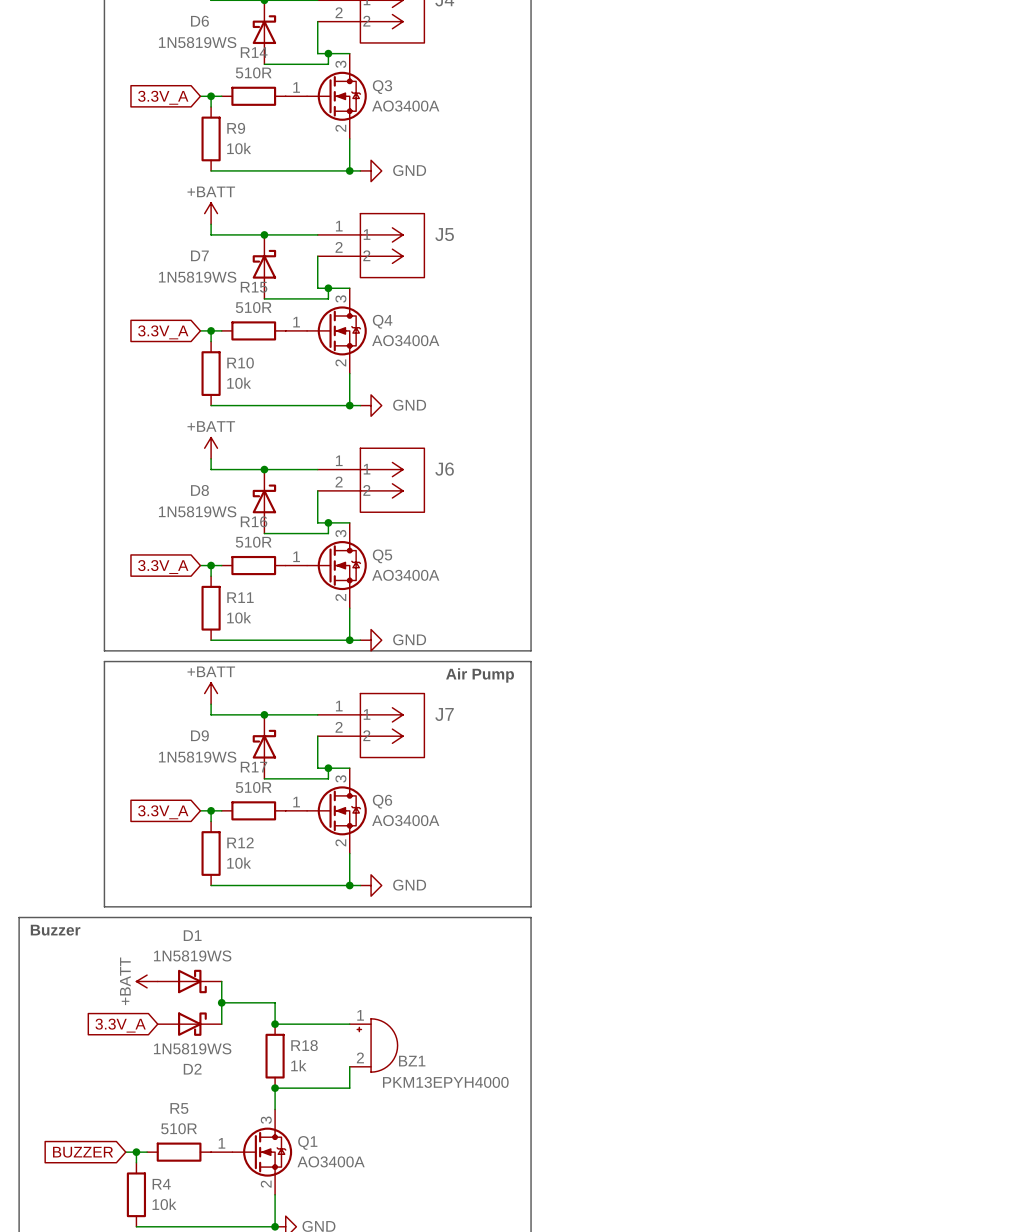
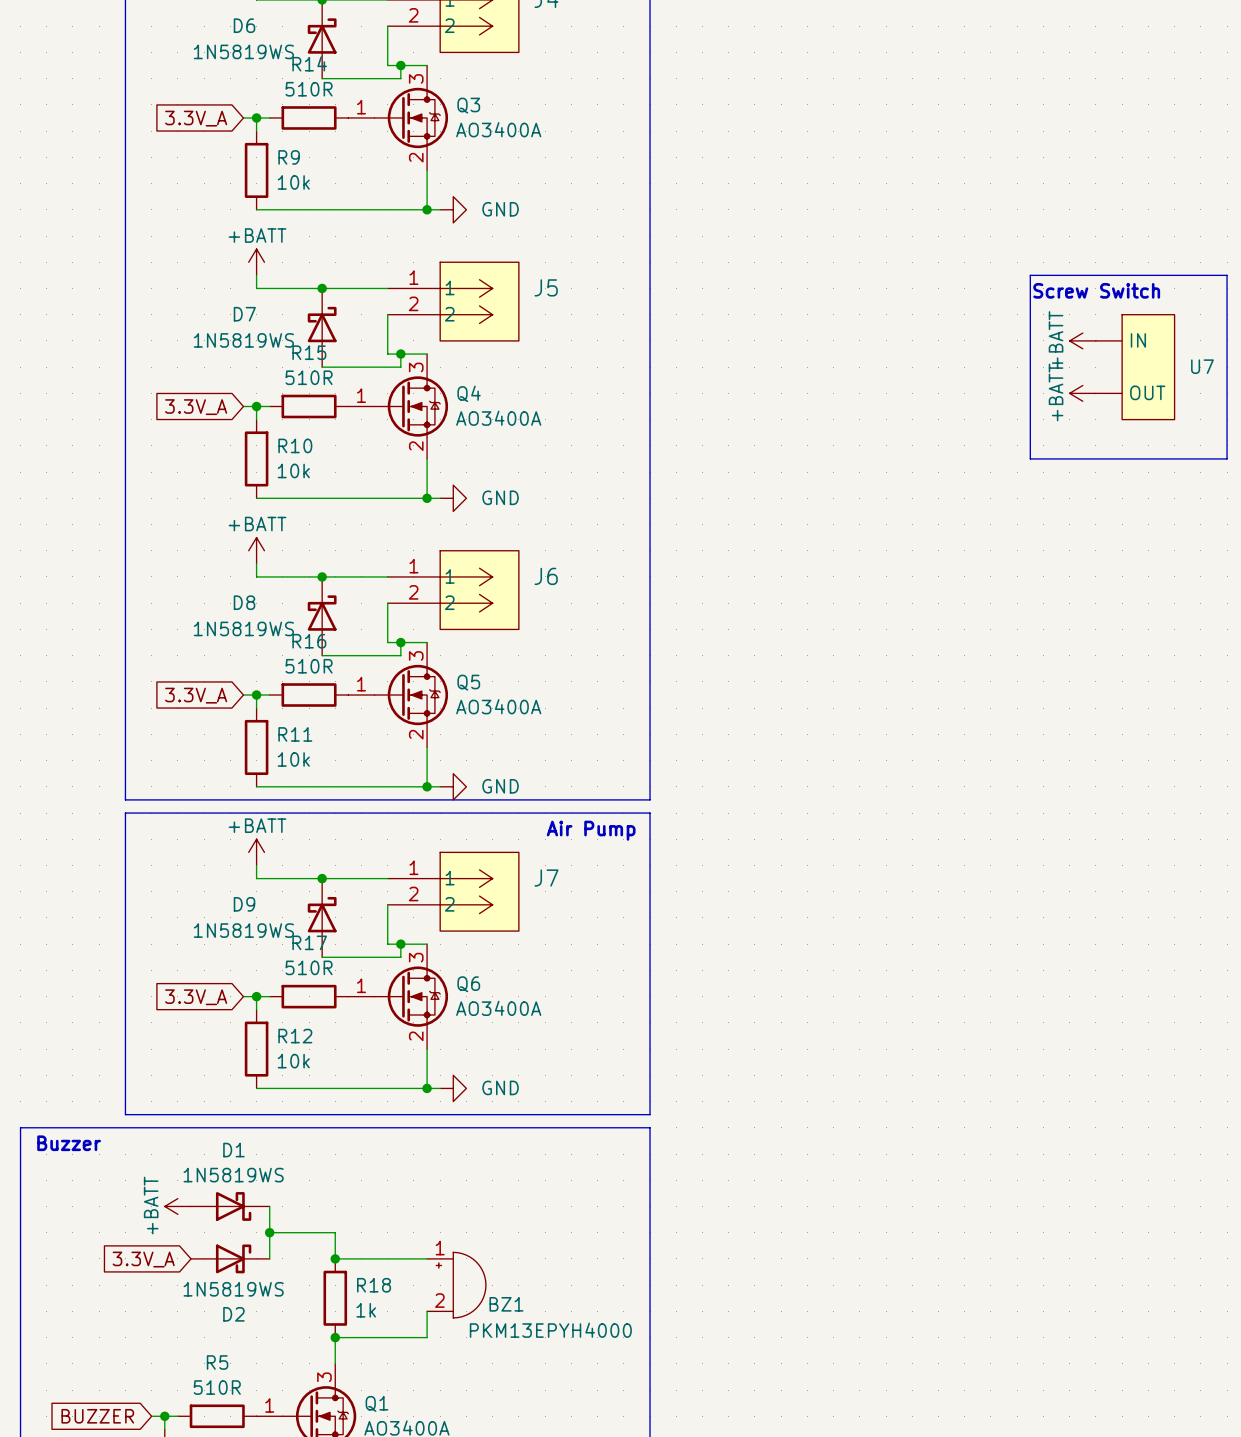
line: none -> (1030, 275) (1227, 275) (1227, 458) (1030, 458) (1030, 275)
text: none -> Screw Switch (1096, 290)
power symbol: none -> +BATT (1082, 340)
U7: none -> (1135, 367)
power symbol: none -> +BATT (1082, 393)

